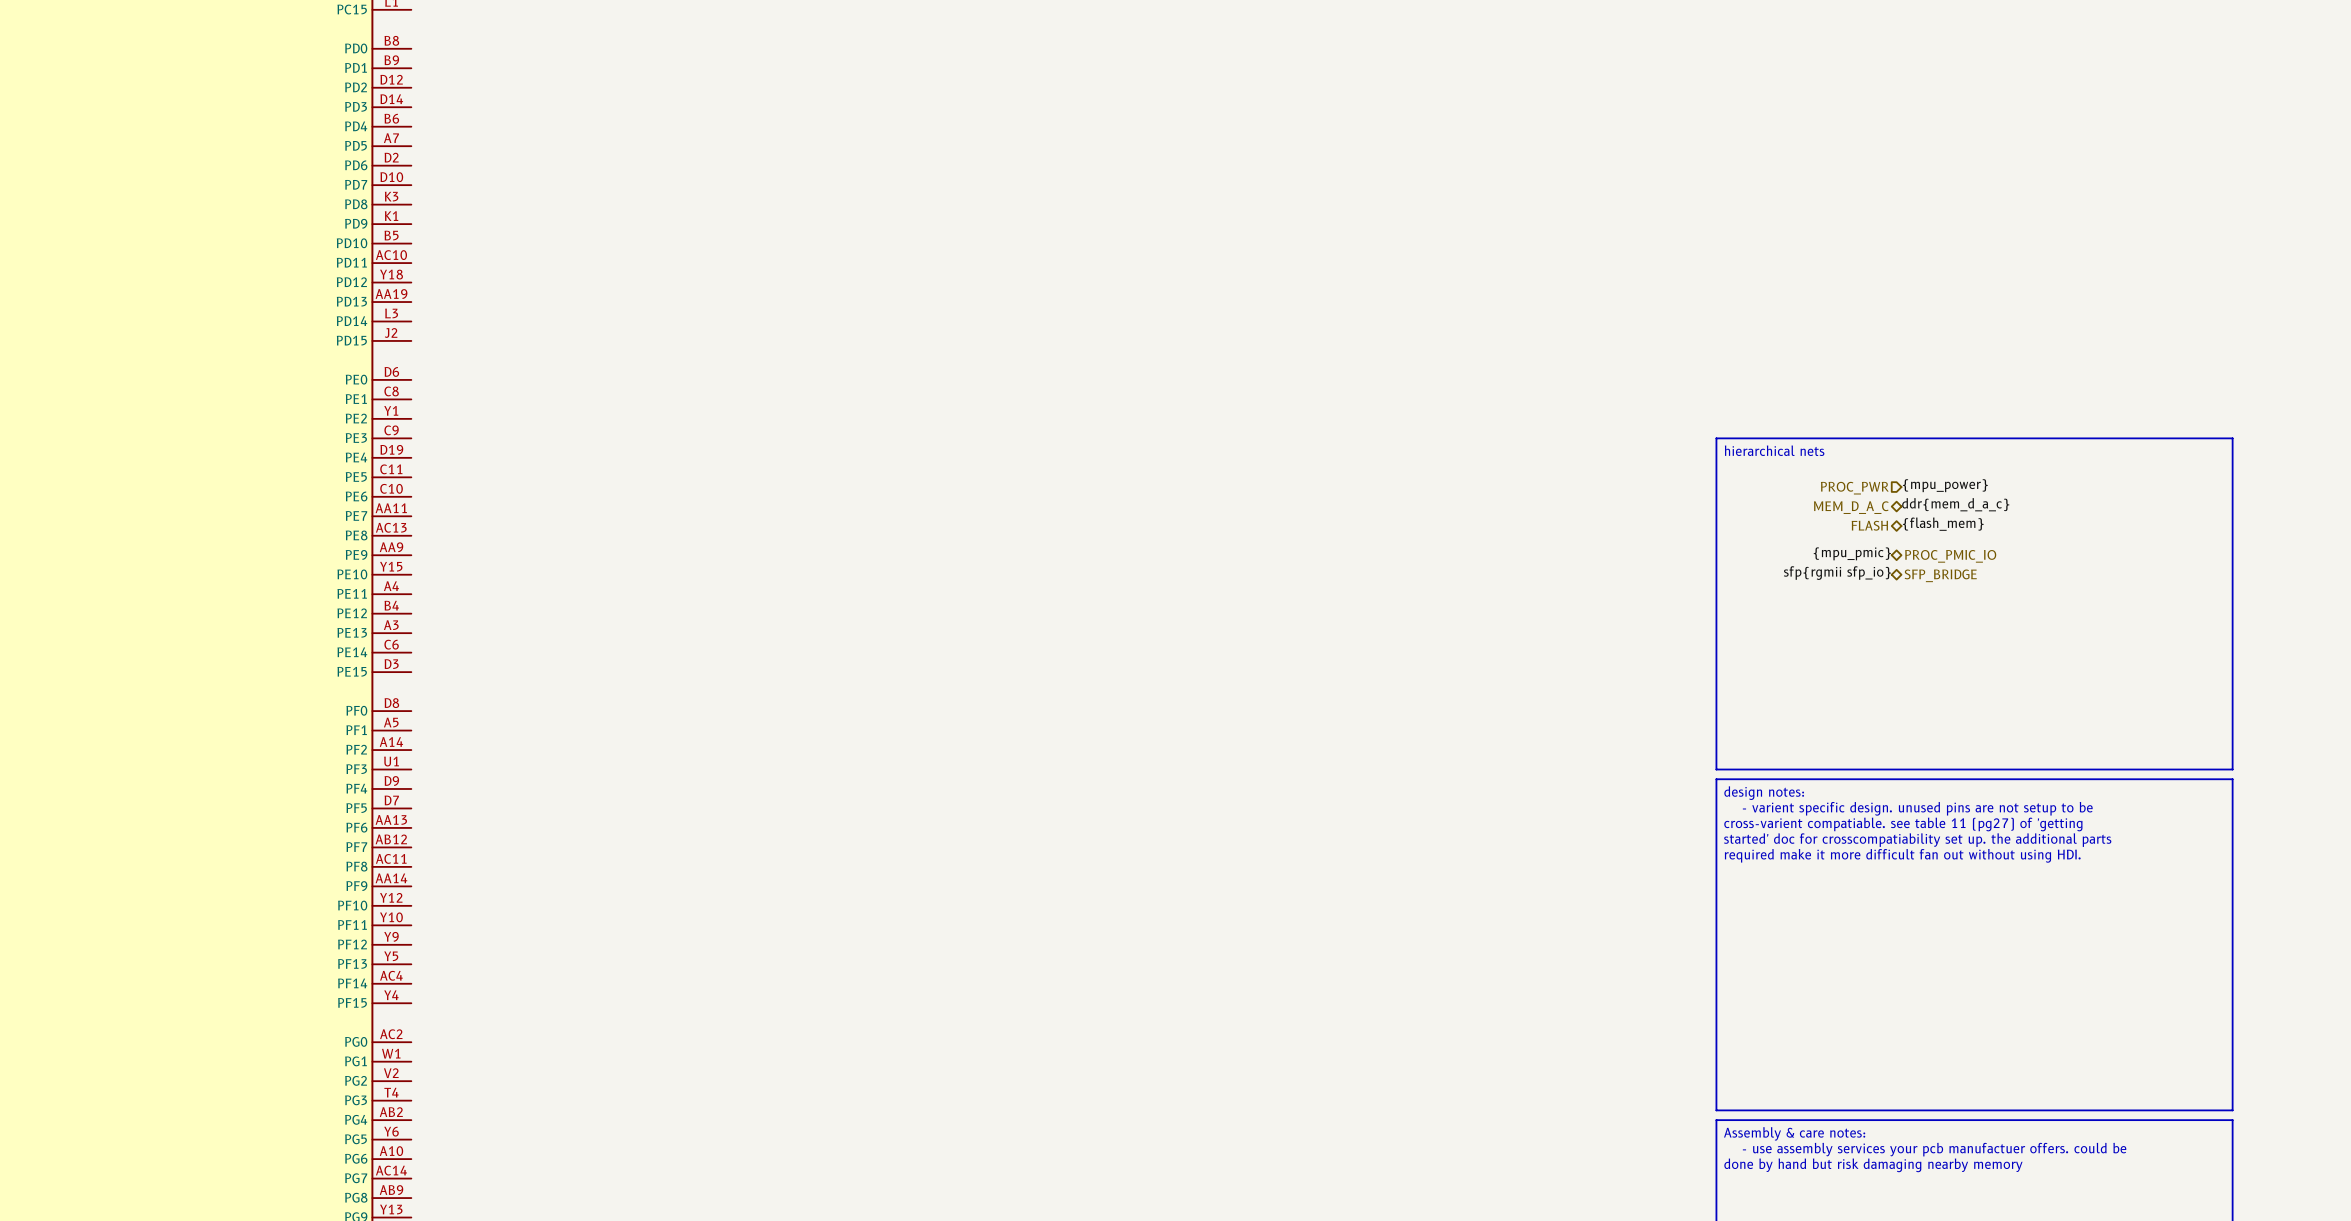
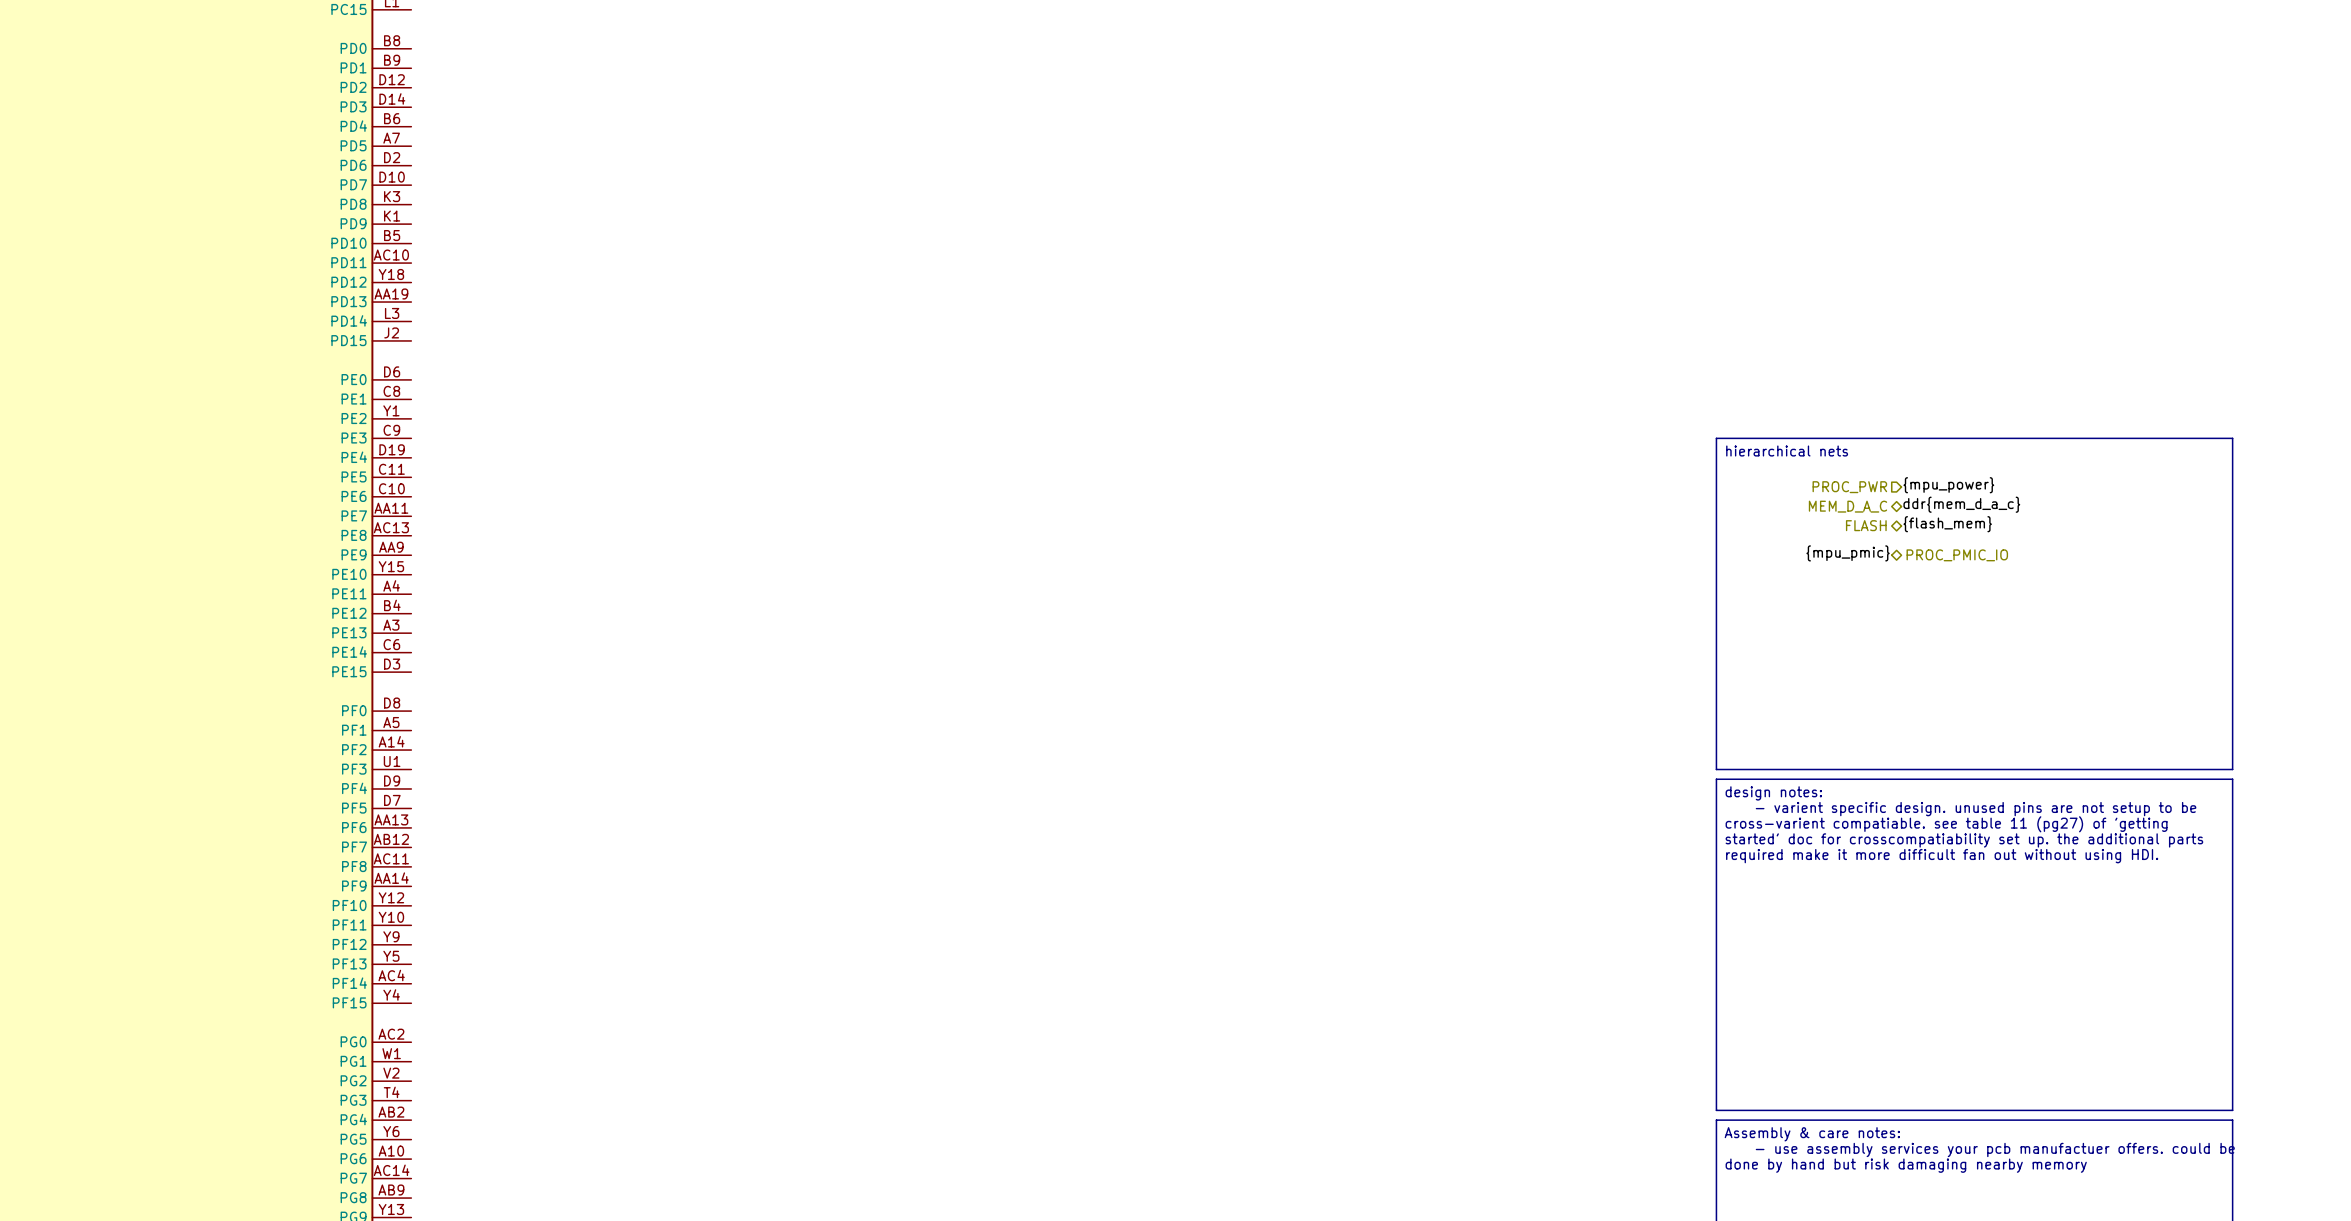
label: sfp{rgmii sfp_io} (1837, 573) -> none
hierarchical label: SFP_BRIDGE (1940, 575) -> none

